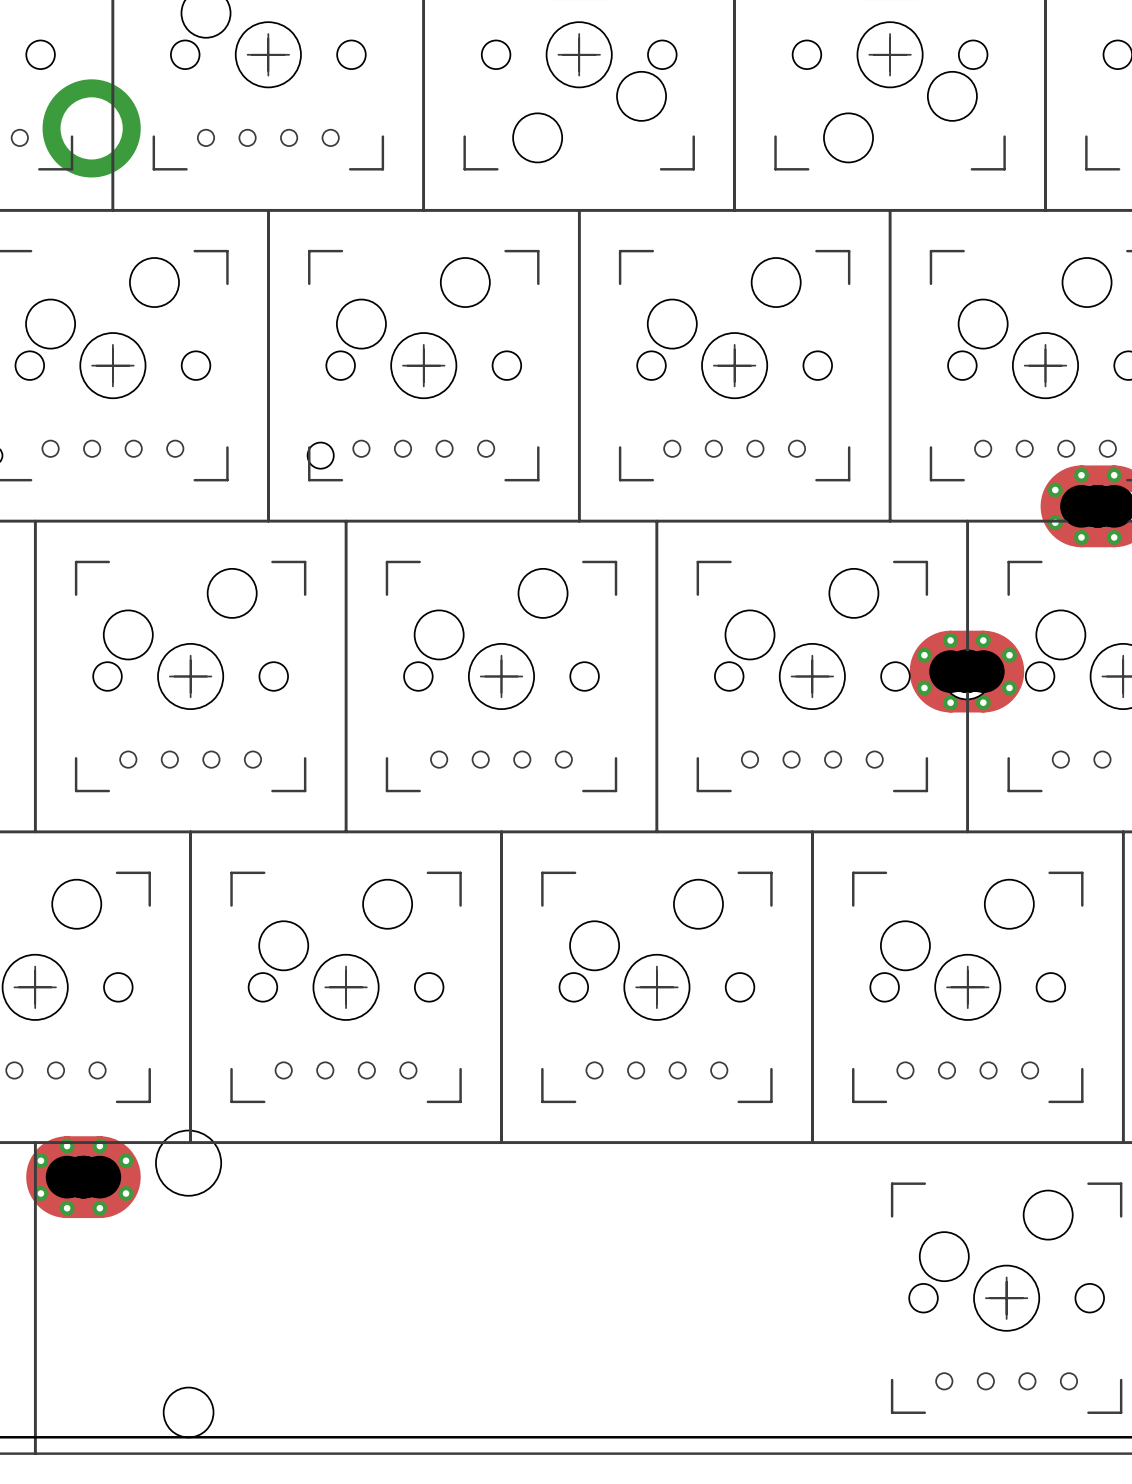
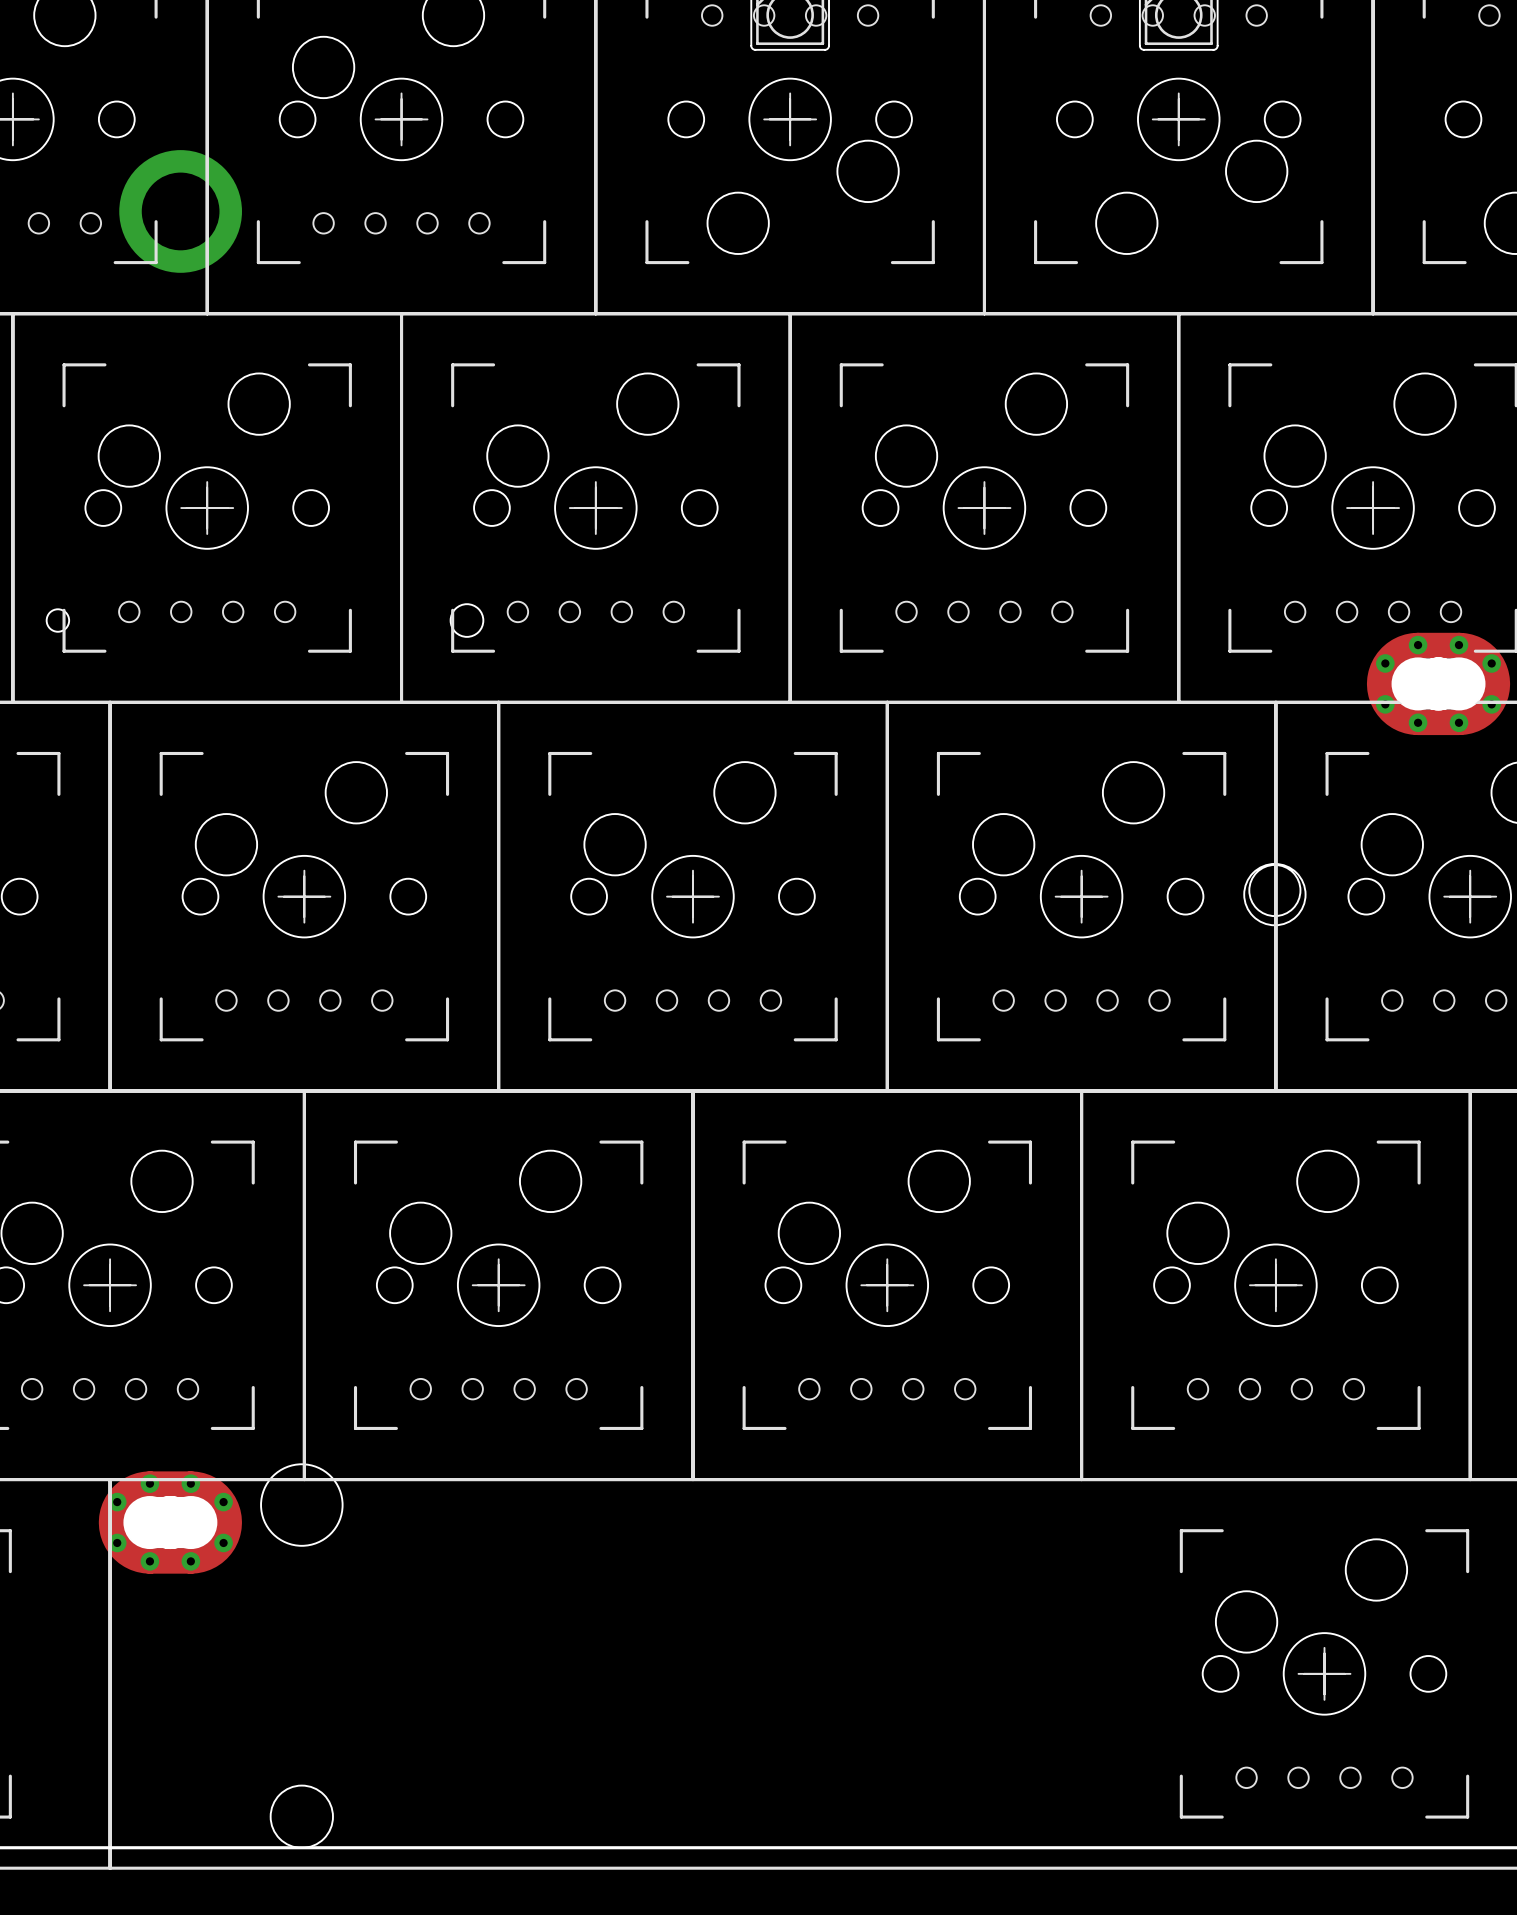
part: (966, 671) -> none

